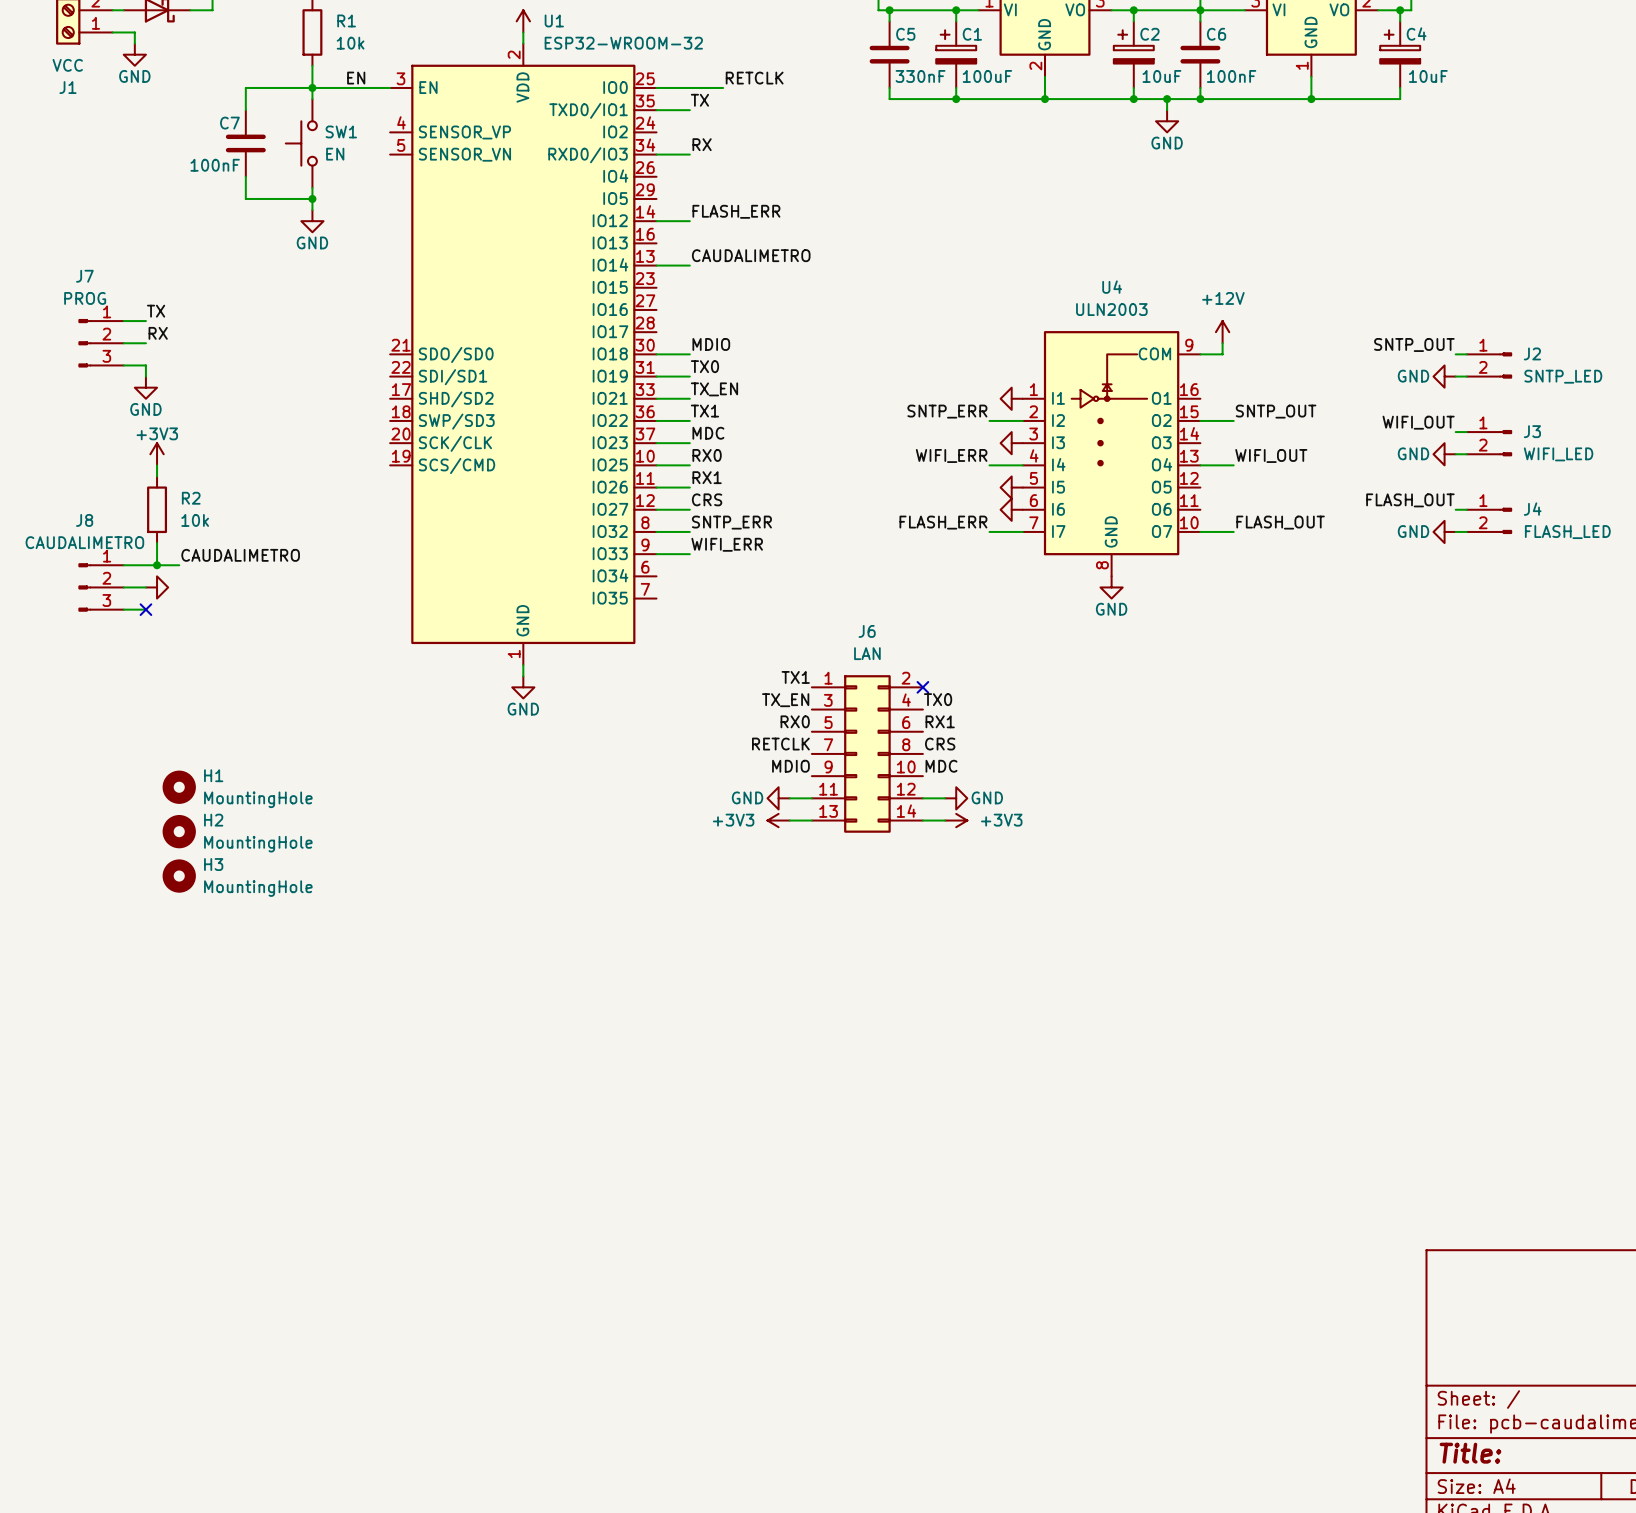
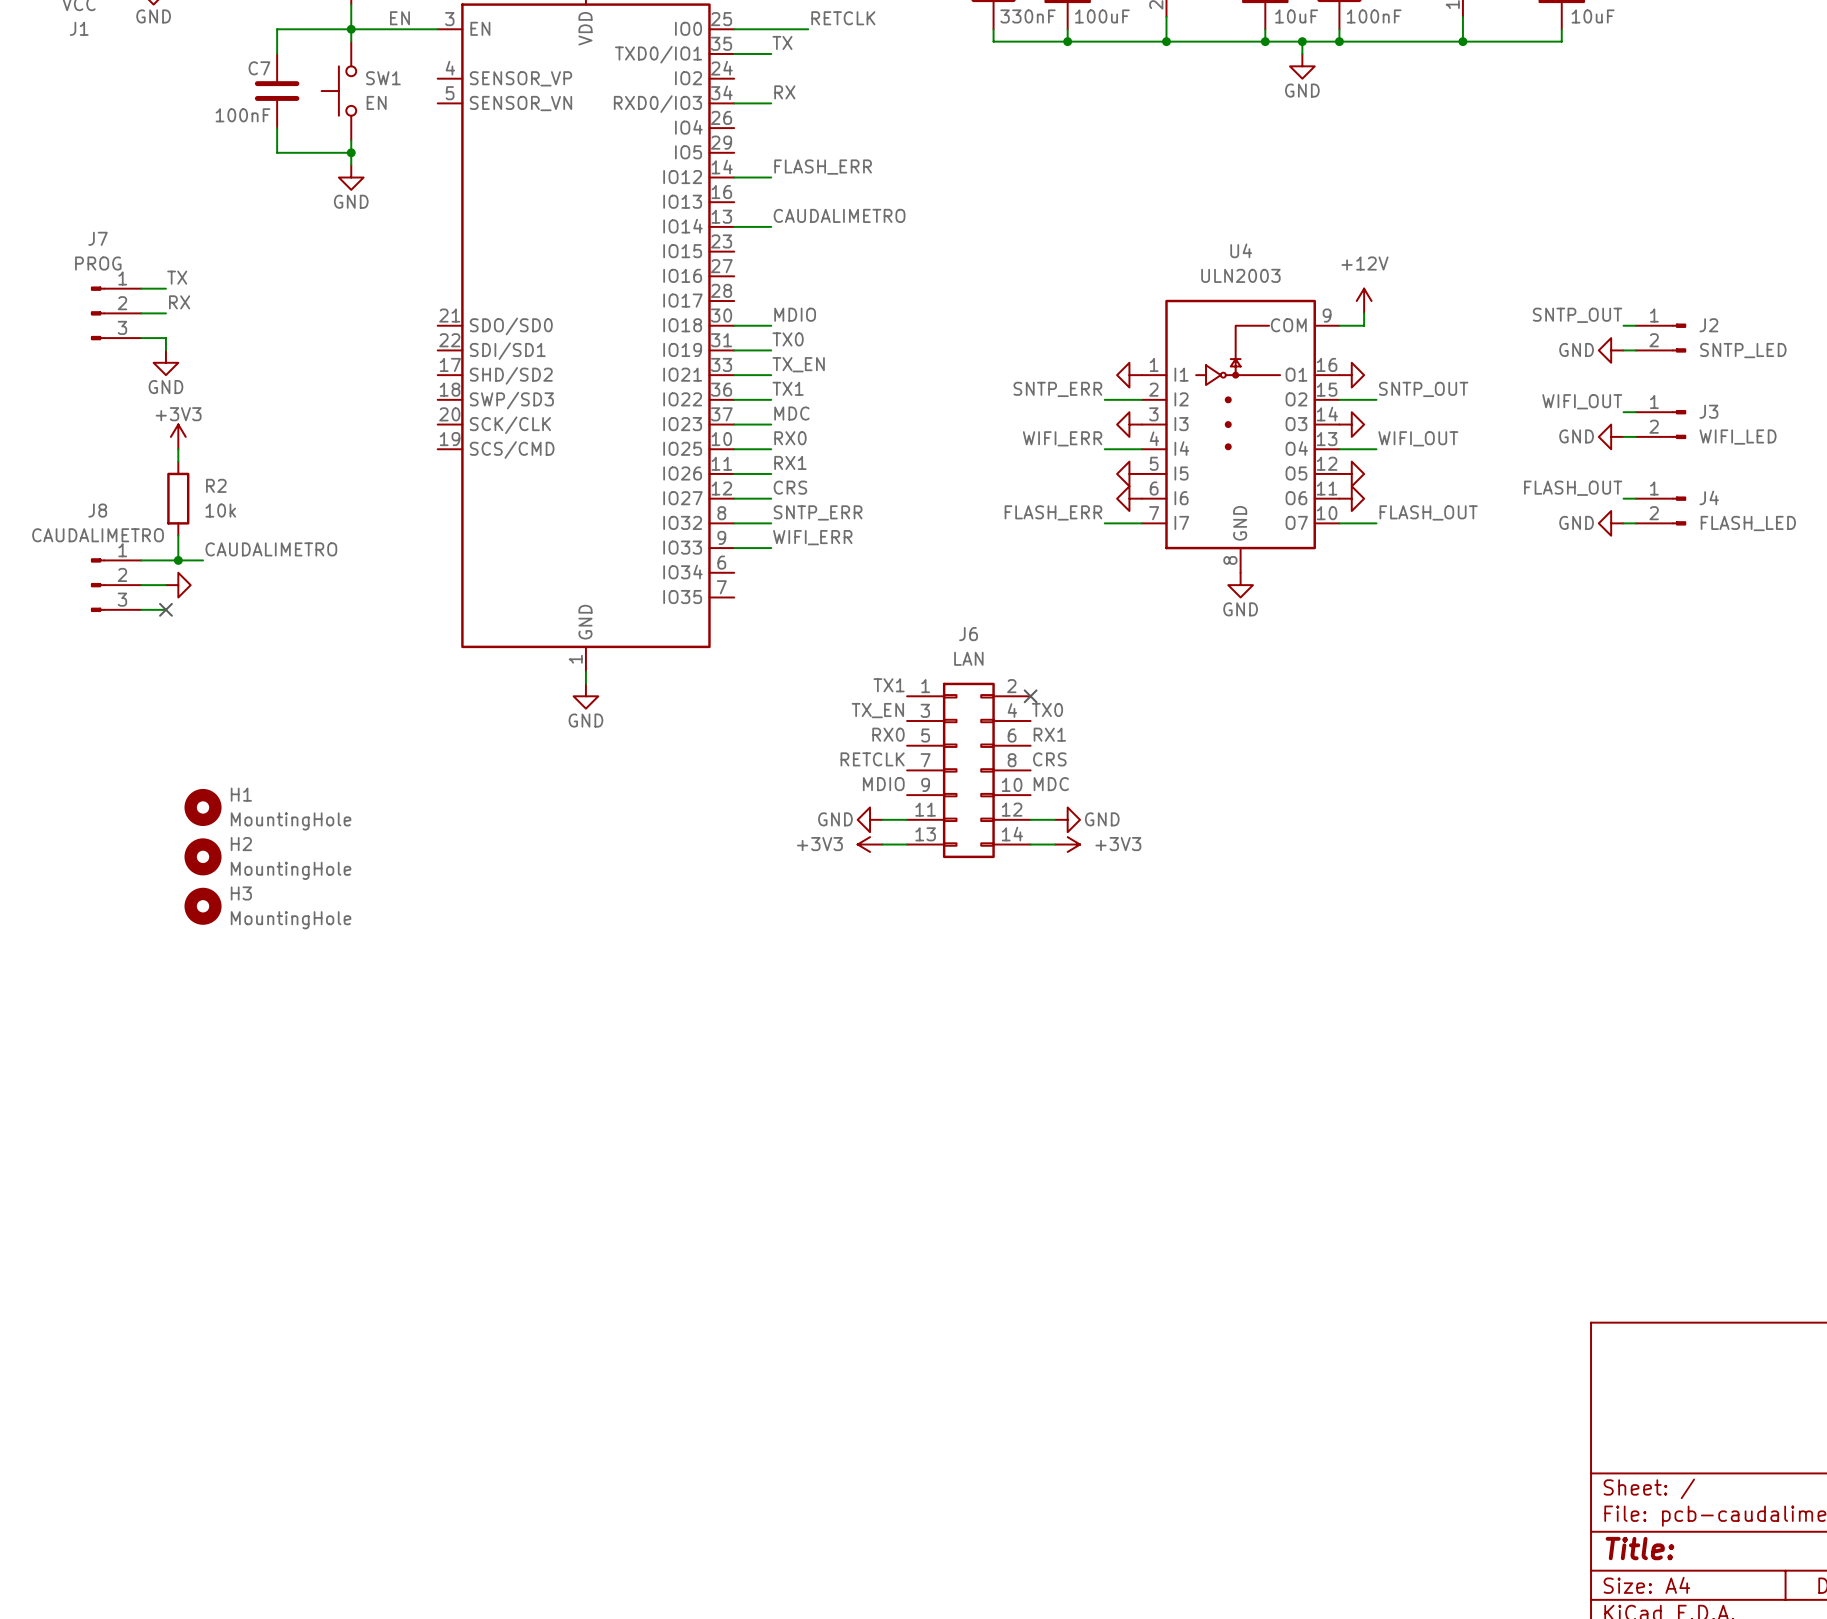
power symbol: none -> (1351, 375)
power symbol: none -> (1351, 424)
power symbol: none -> (1351, 473)
power symbol: none -> (1351, 498)

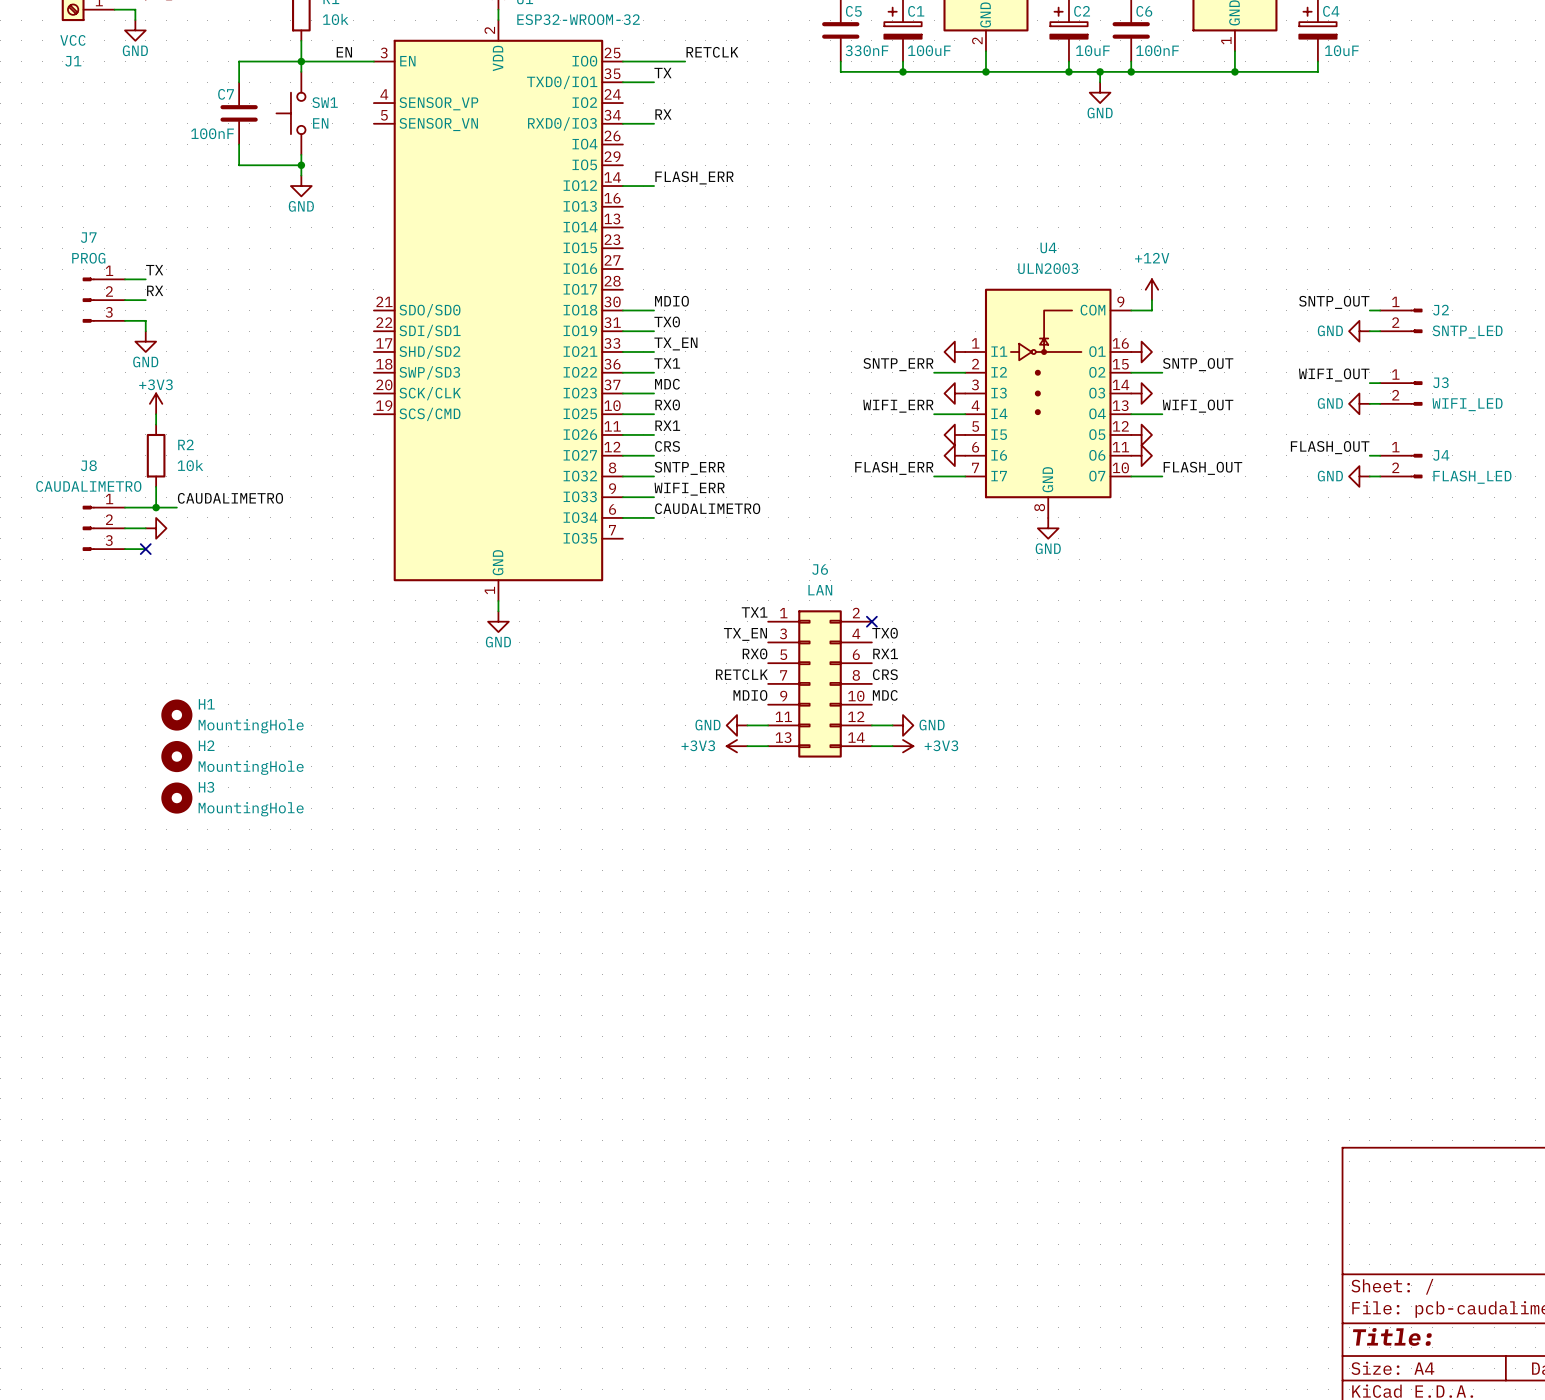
label: CAUDALIMETRO (839, 215) -> none
wire: (734, 226) (771, 226) -> none
label: none -> CAUDALIMETRO (707, 508)
wire: none -> (622, 517) (654, 517)

